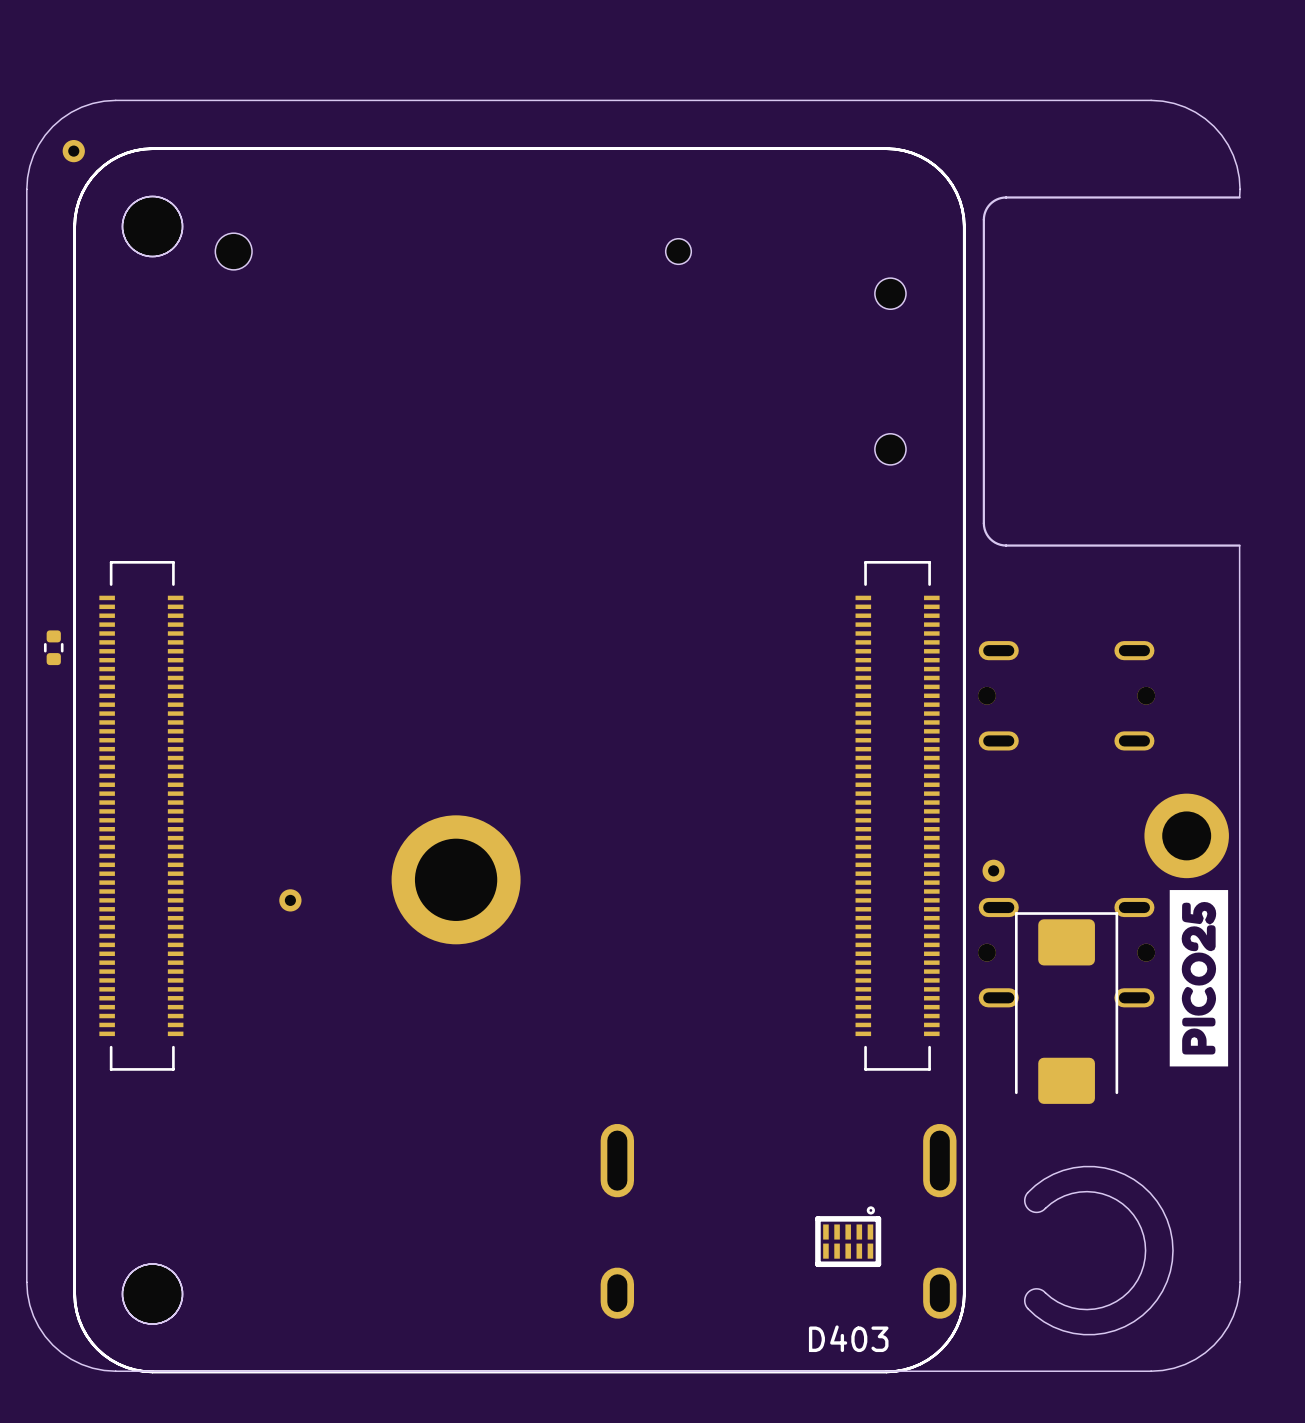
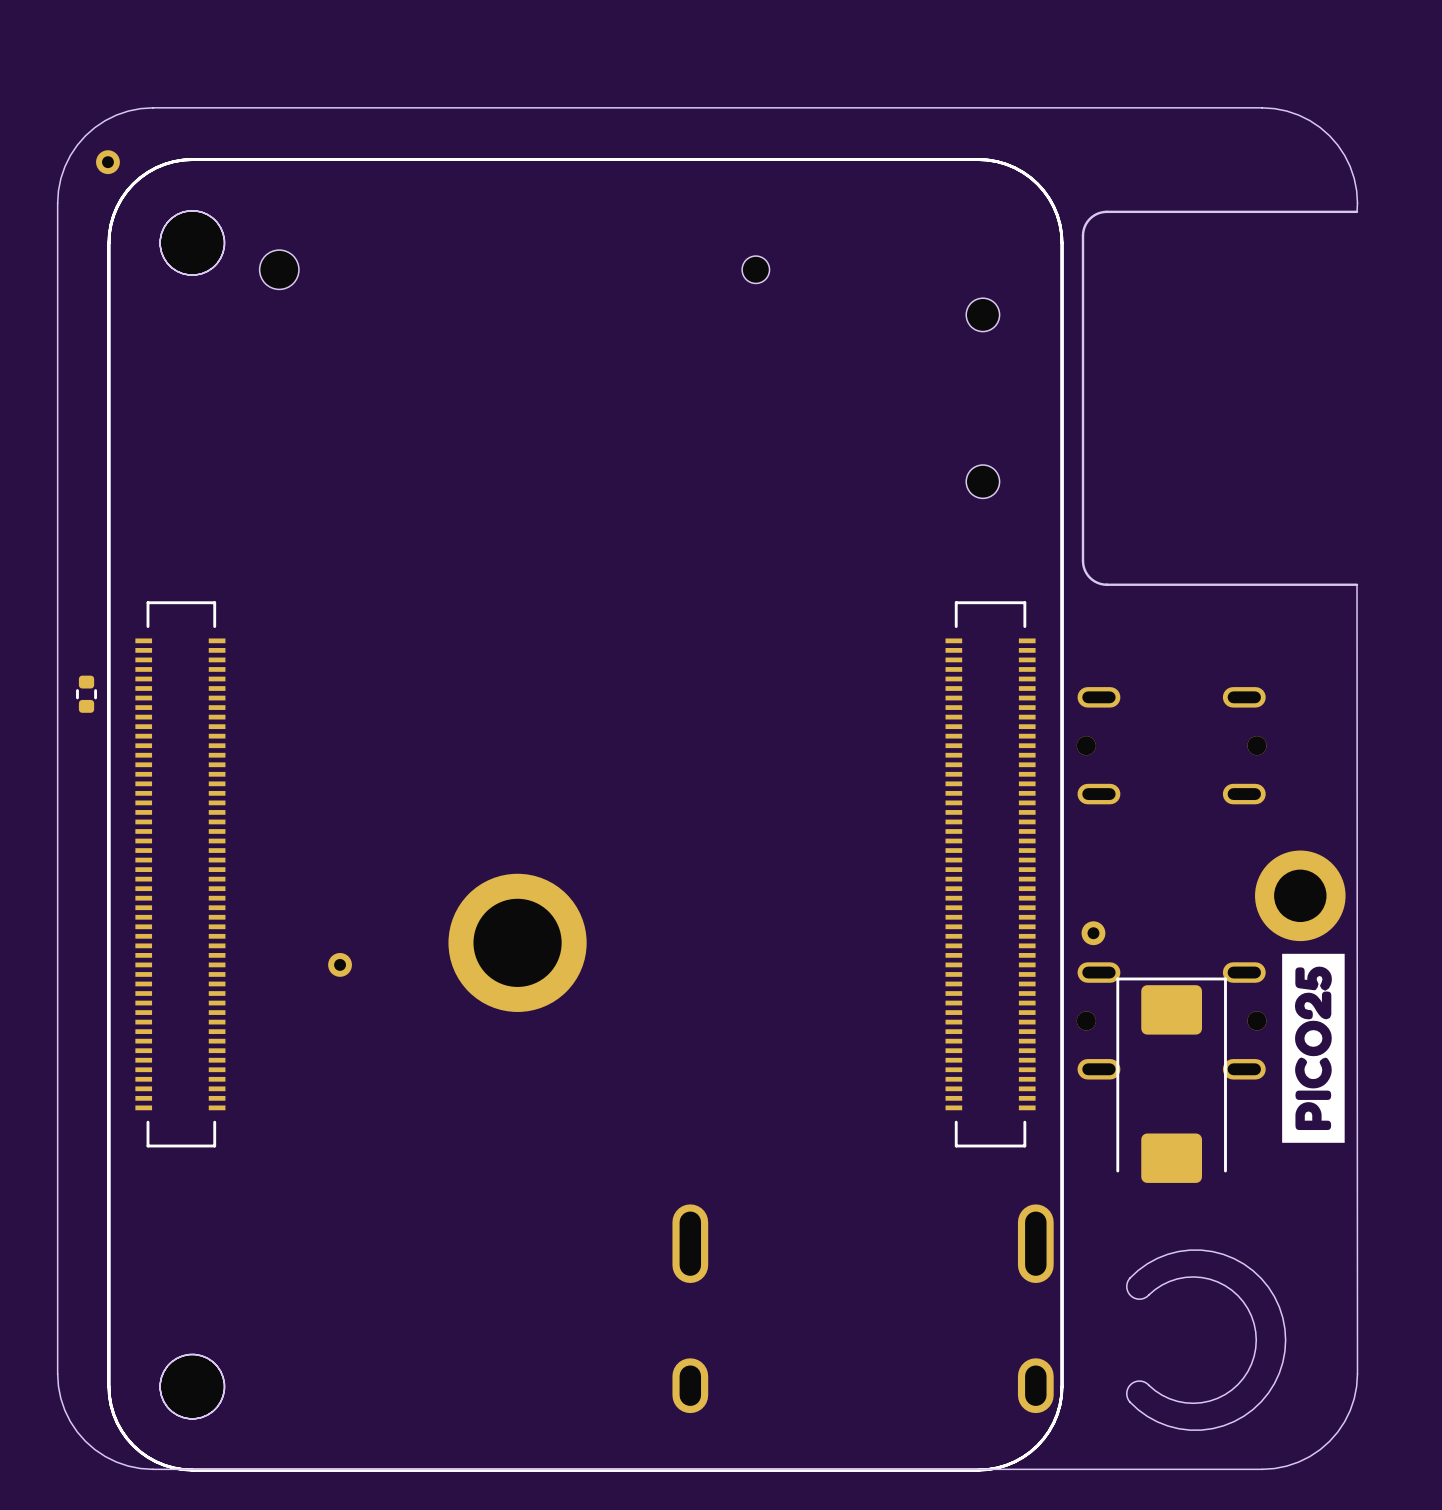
D403: (848, 1236) -> none

